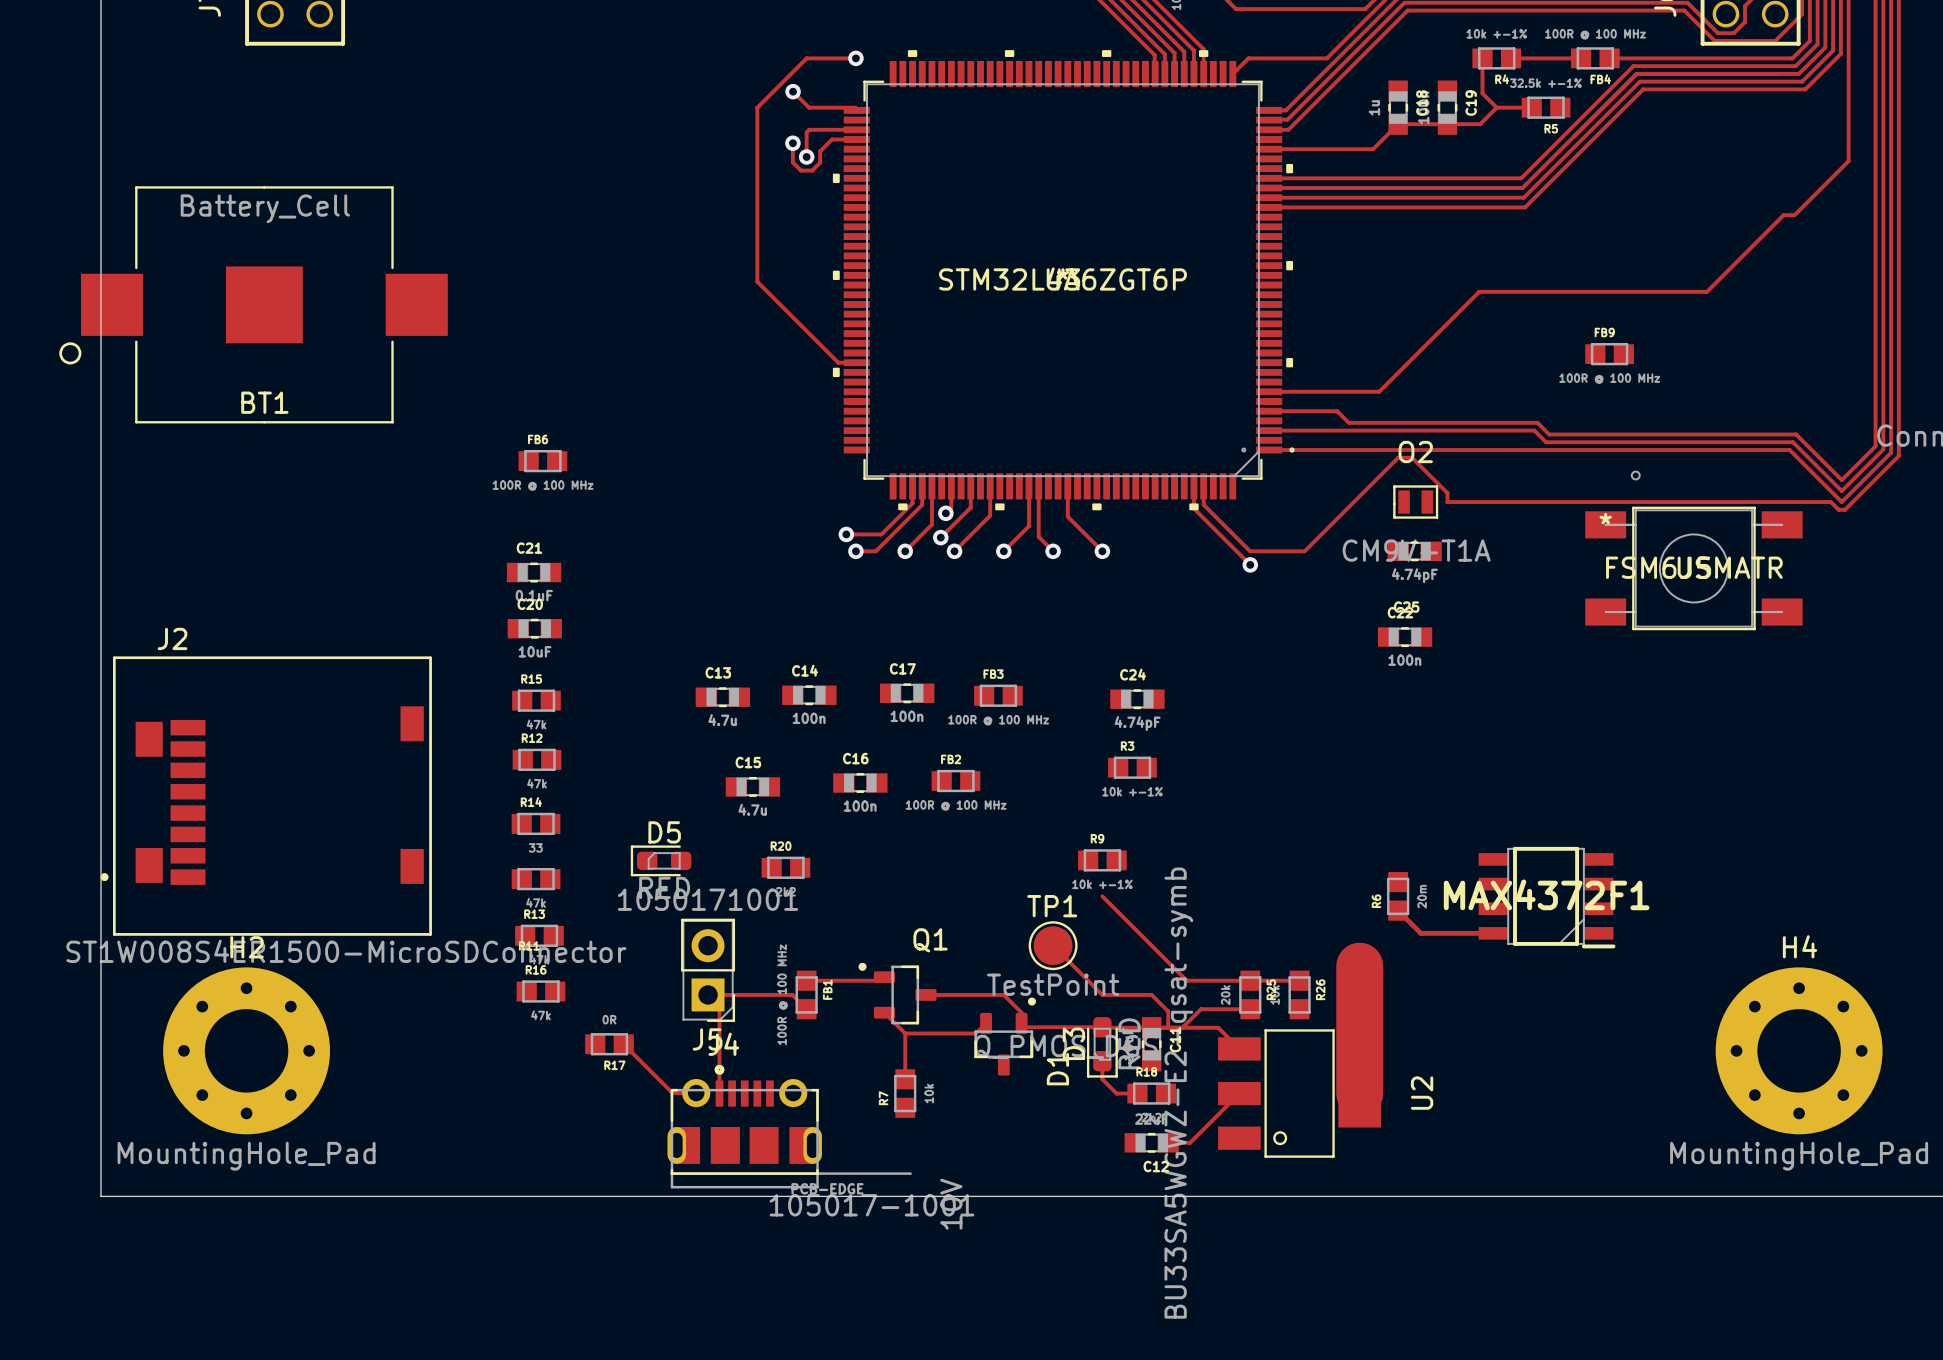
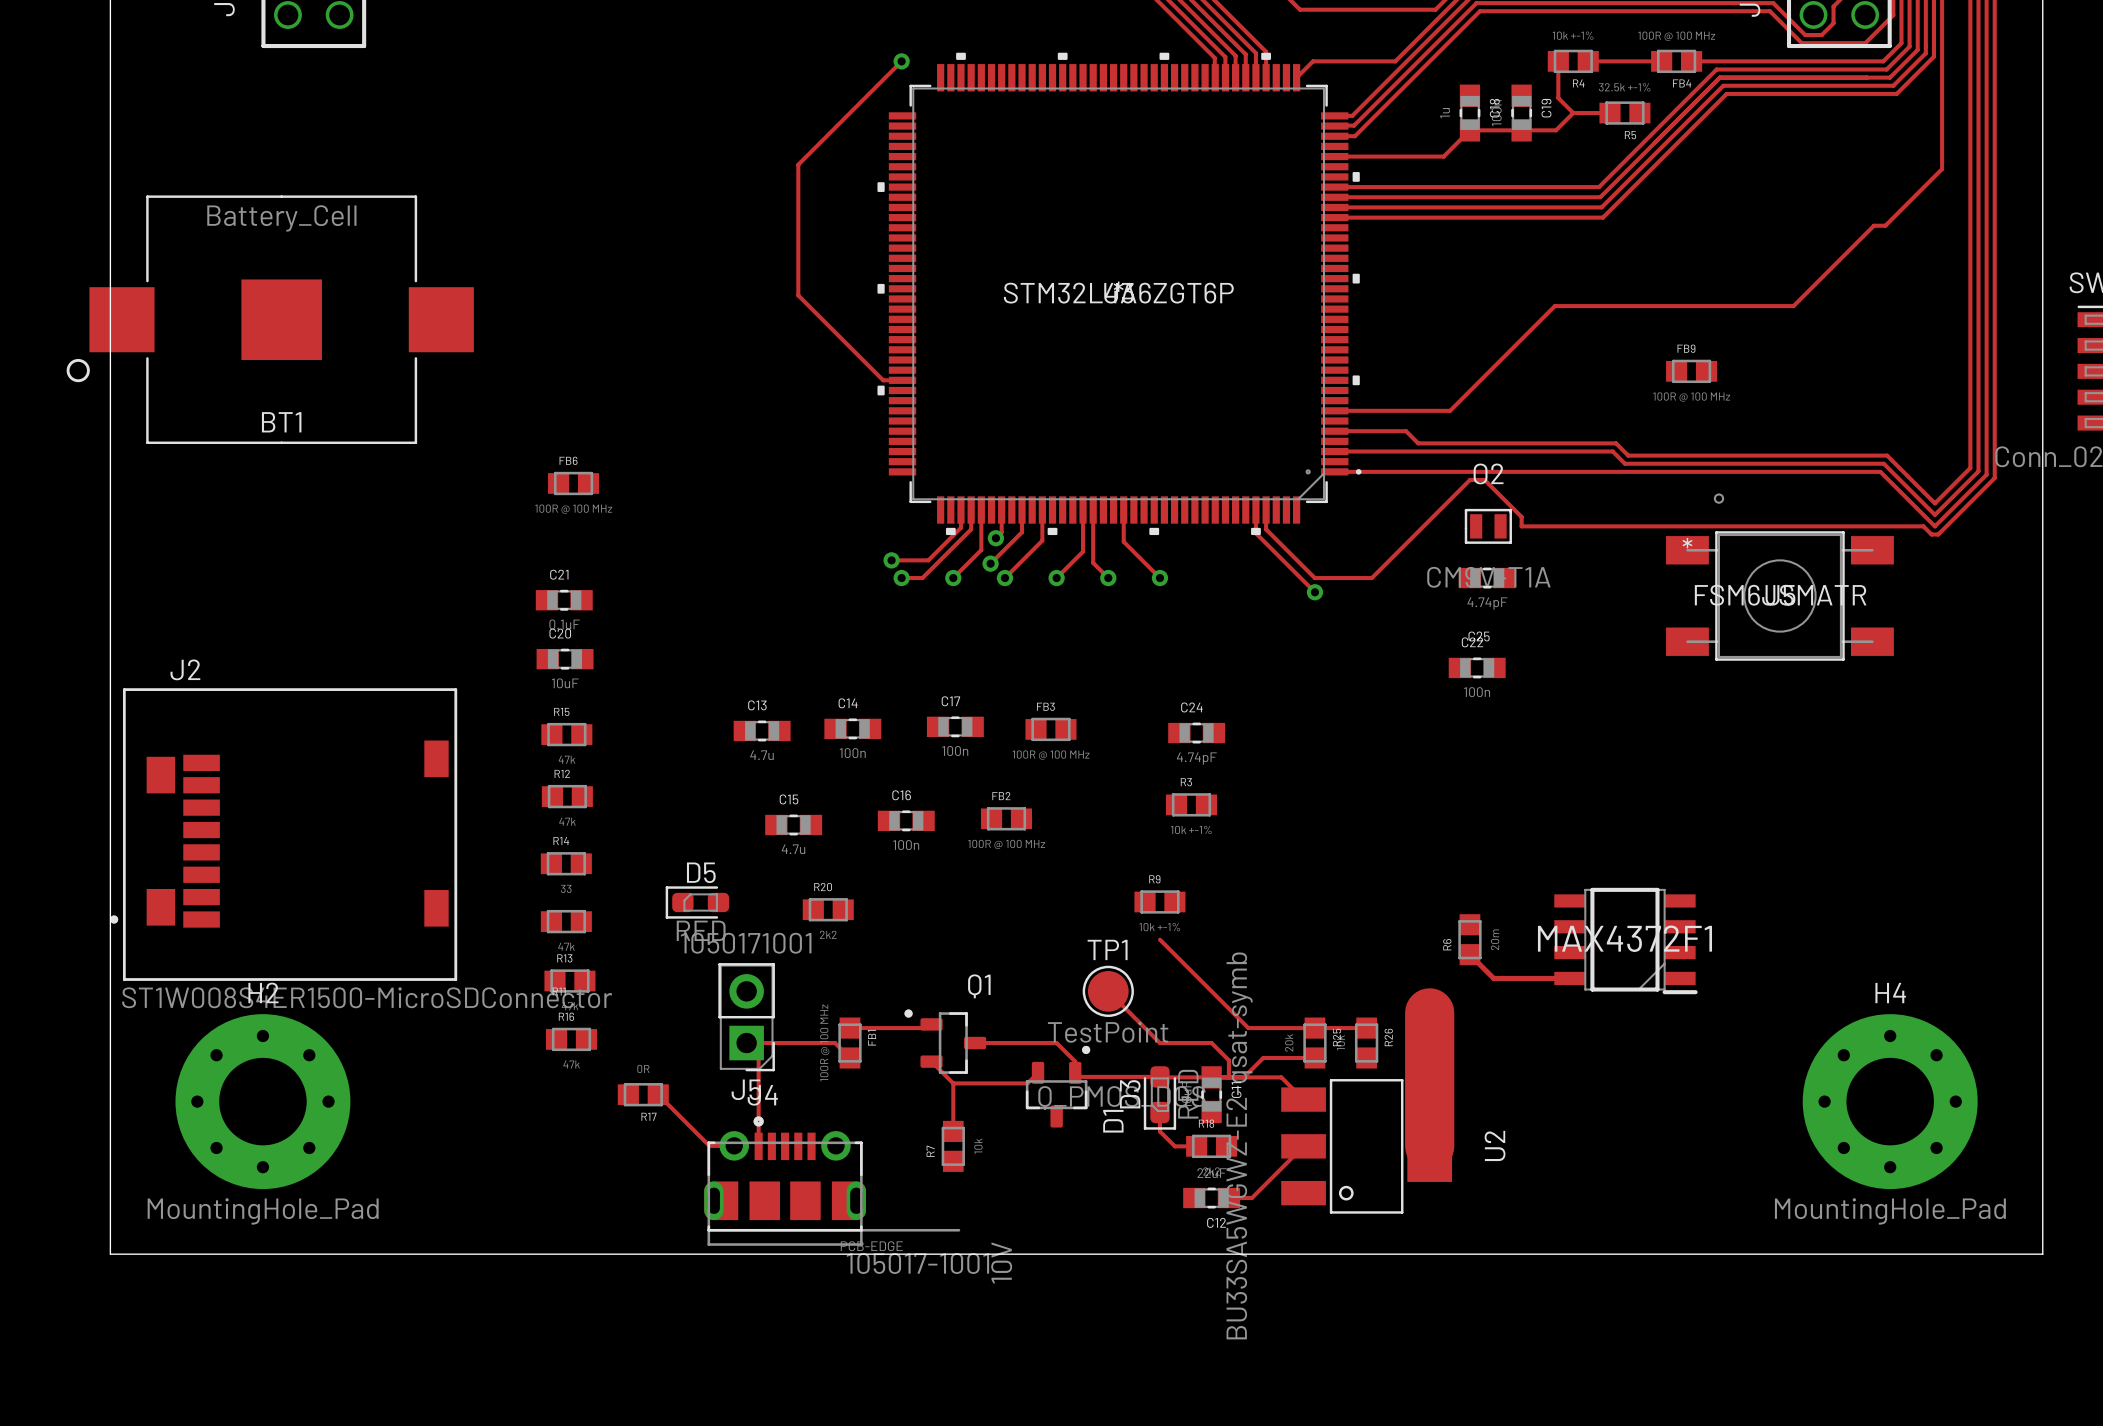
track: (855, 58) (806, 58) (757, 107) (757, 156) -> (901, 61) (798, 164)
track: (793, 91) (809, 107) (855, 107) -> none
via: (793, 91) -> none
track: (856, 129) (809, 129) (806, 132) (806, 156) -> none
track: (856, 139) (832, 139) (820, 151) (820, 162) (812, 170) (801, 170) (792, 162) (792, 143) -> none
via: (792, 143) -> none
via: (806, 156) -> none

